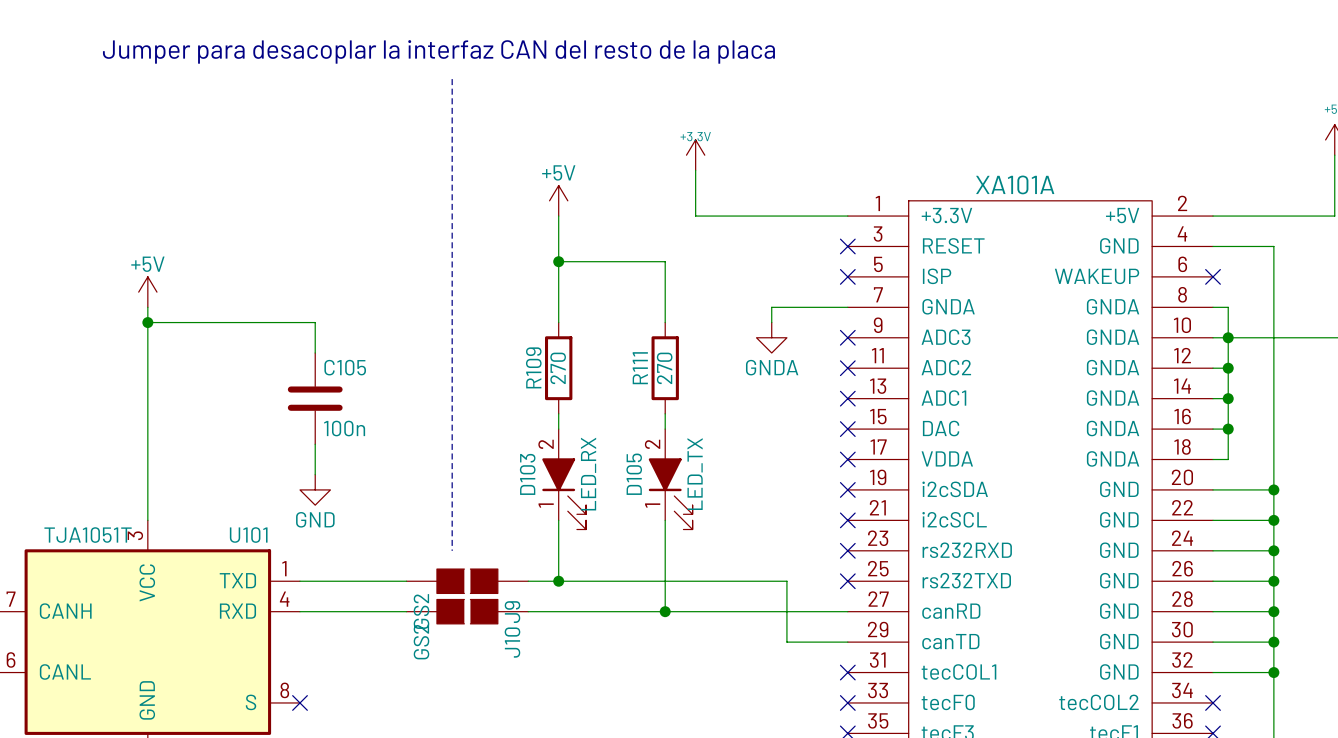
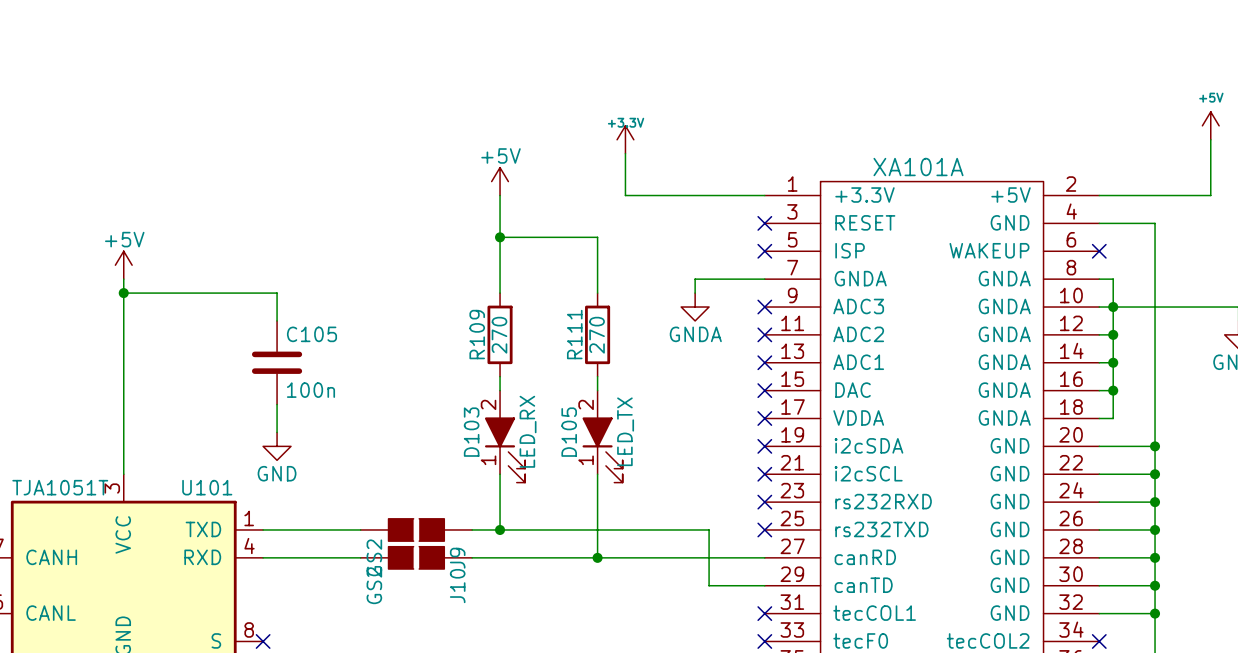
text: Jumper para desacoplar la interfaz CAN del resto de la placa (438, 51) -> none
line: (452, 79) (452, 550) -> none

